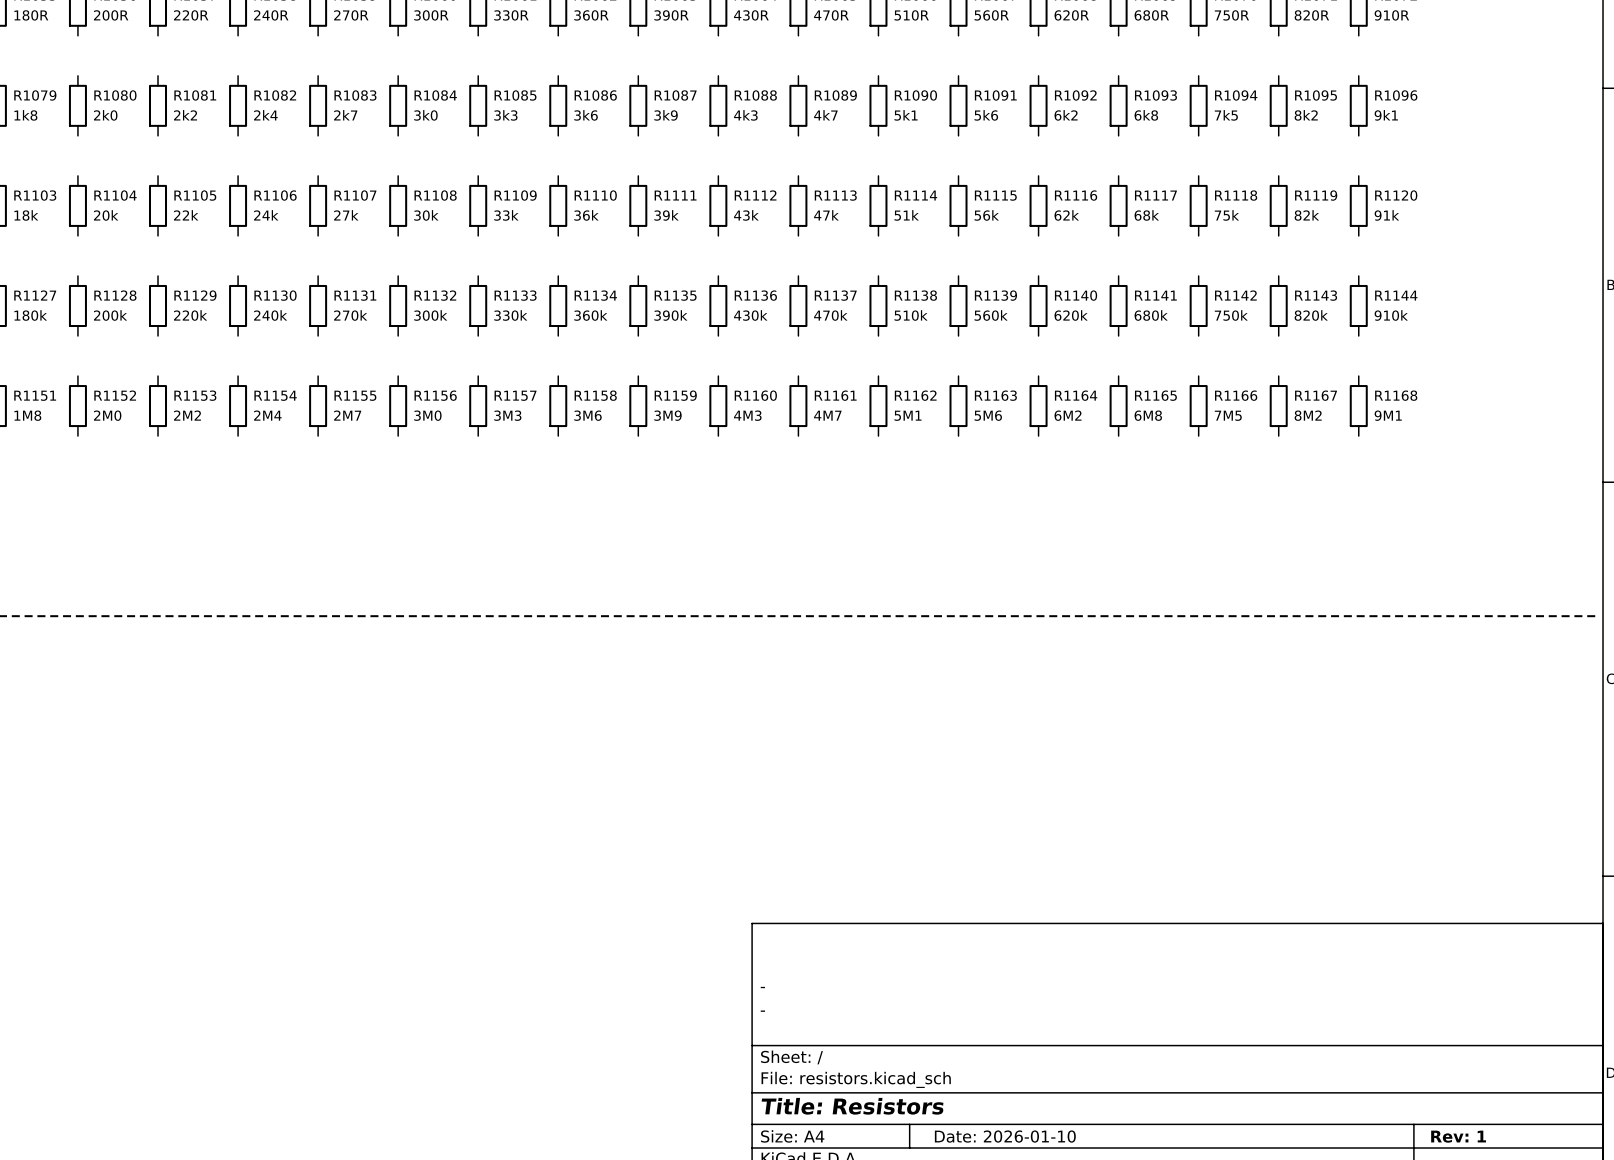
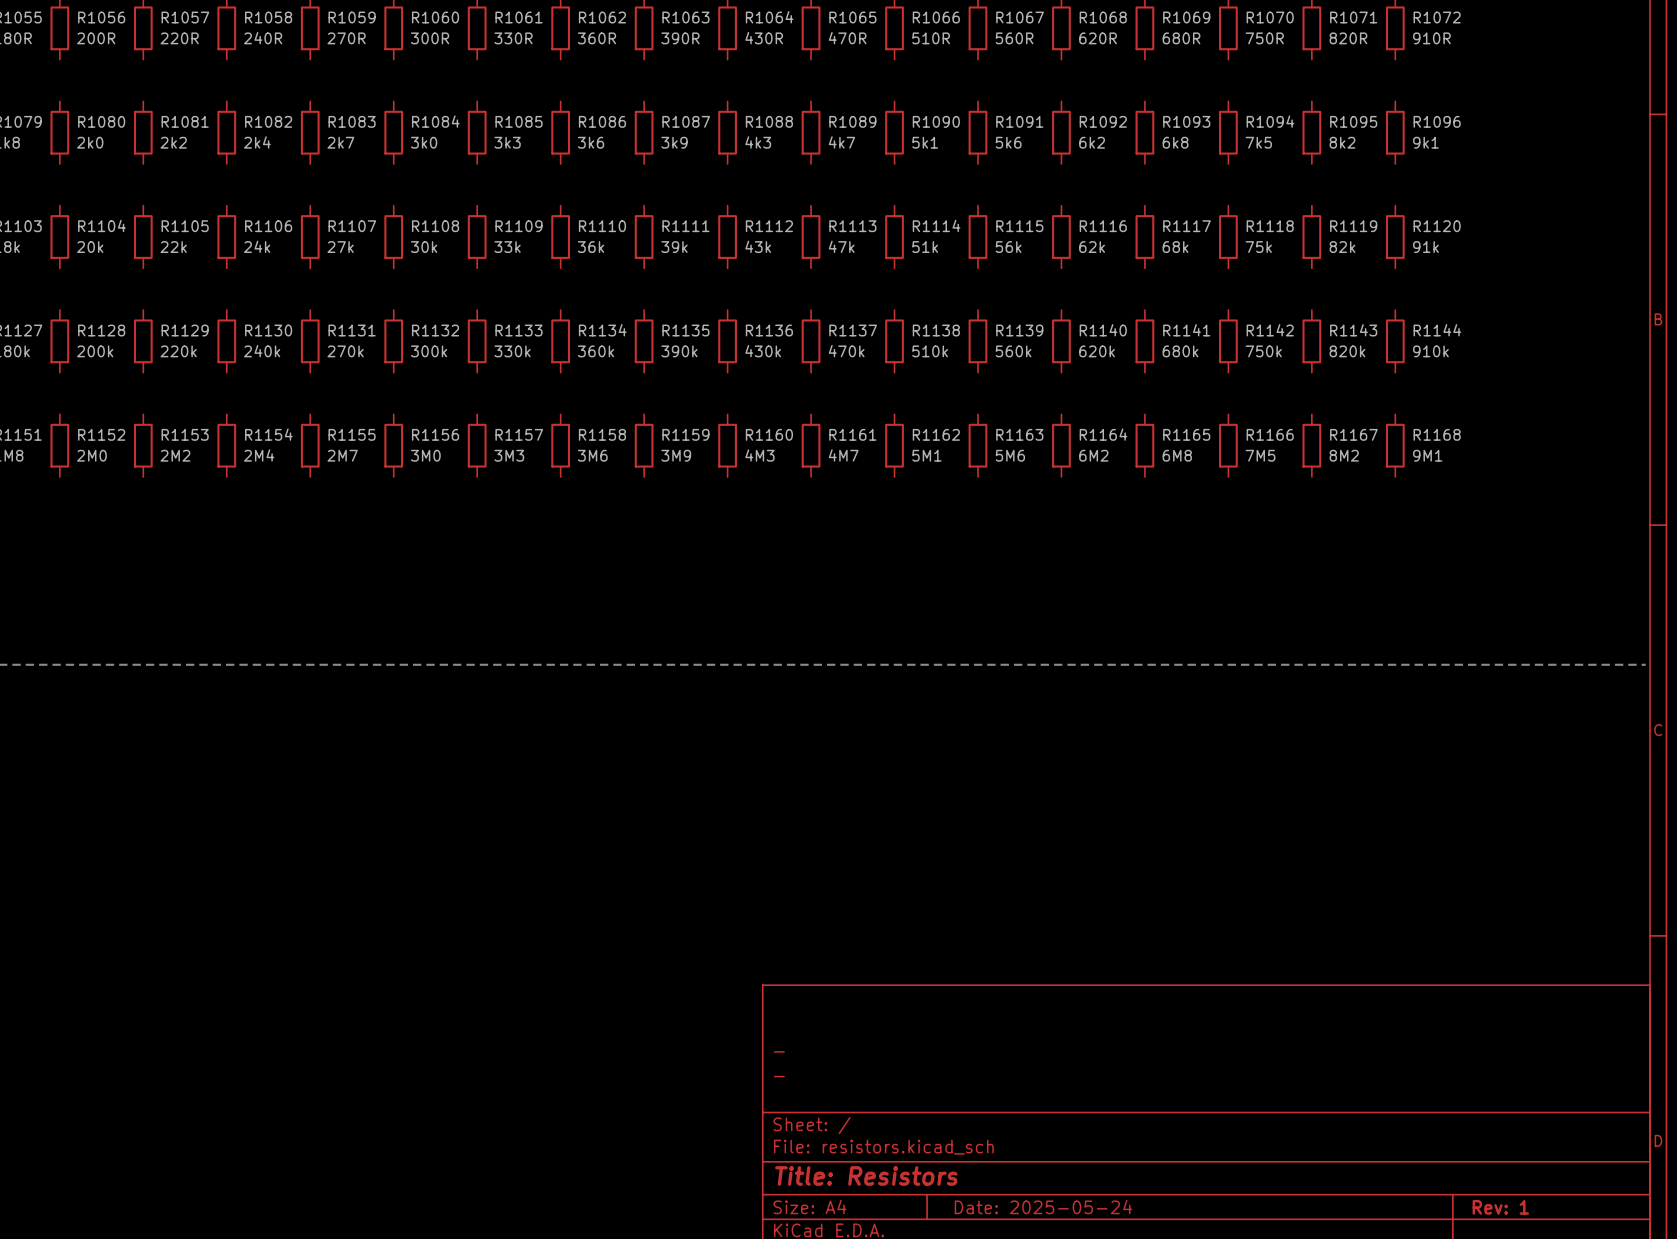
title block: Date: 2026-01-10 (1005, 1136) -> Date: 2025-05-24 (1043, 1207)

